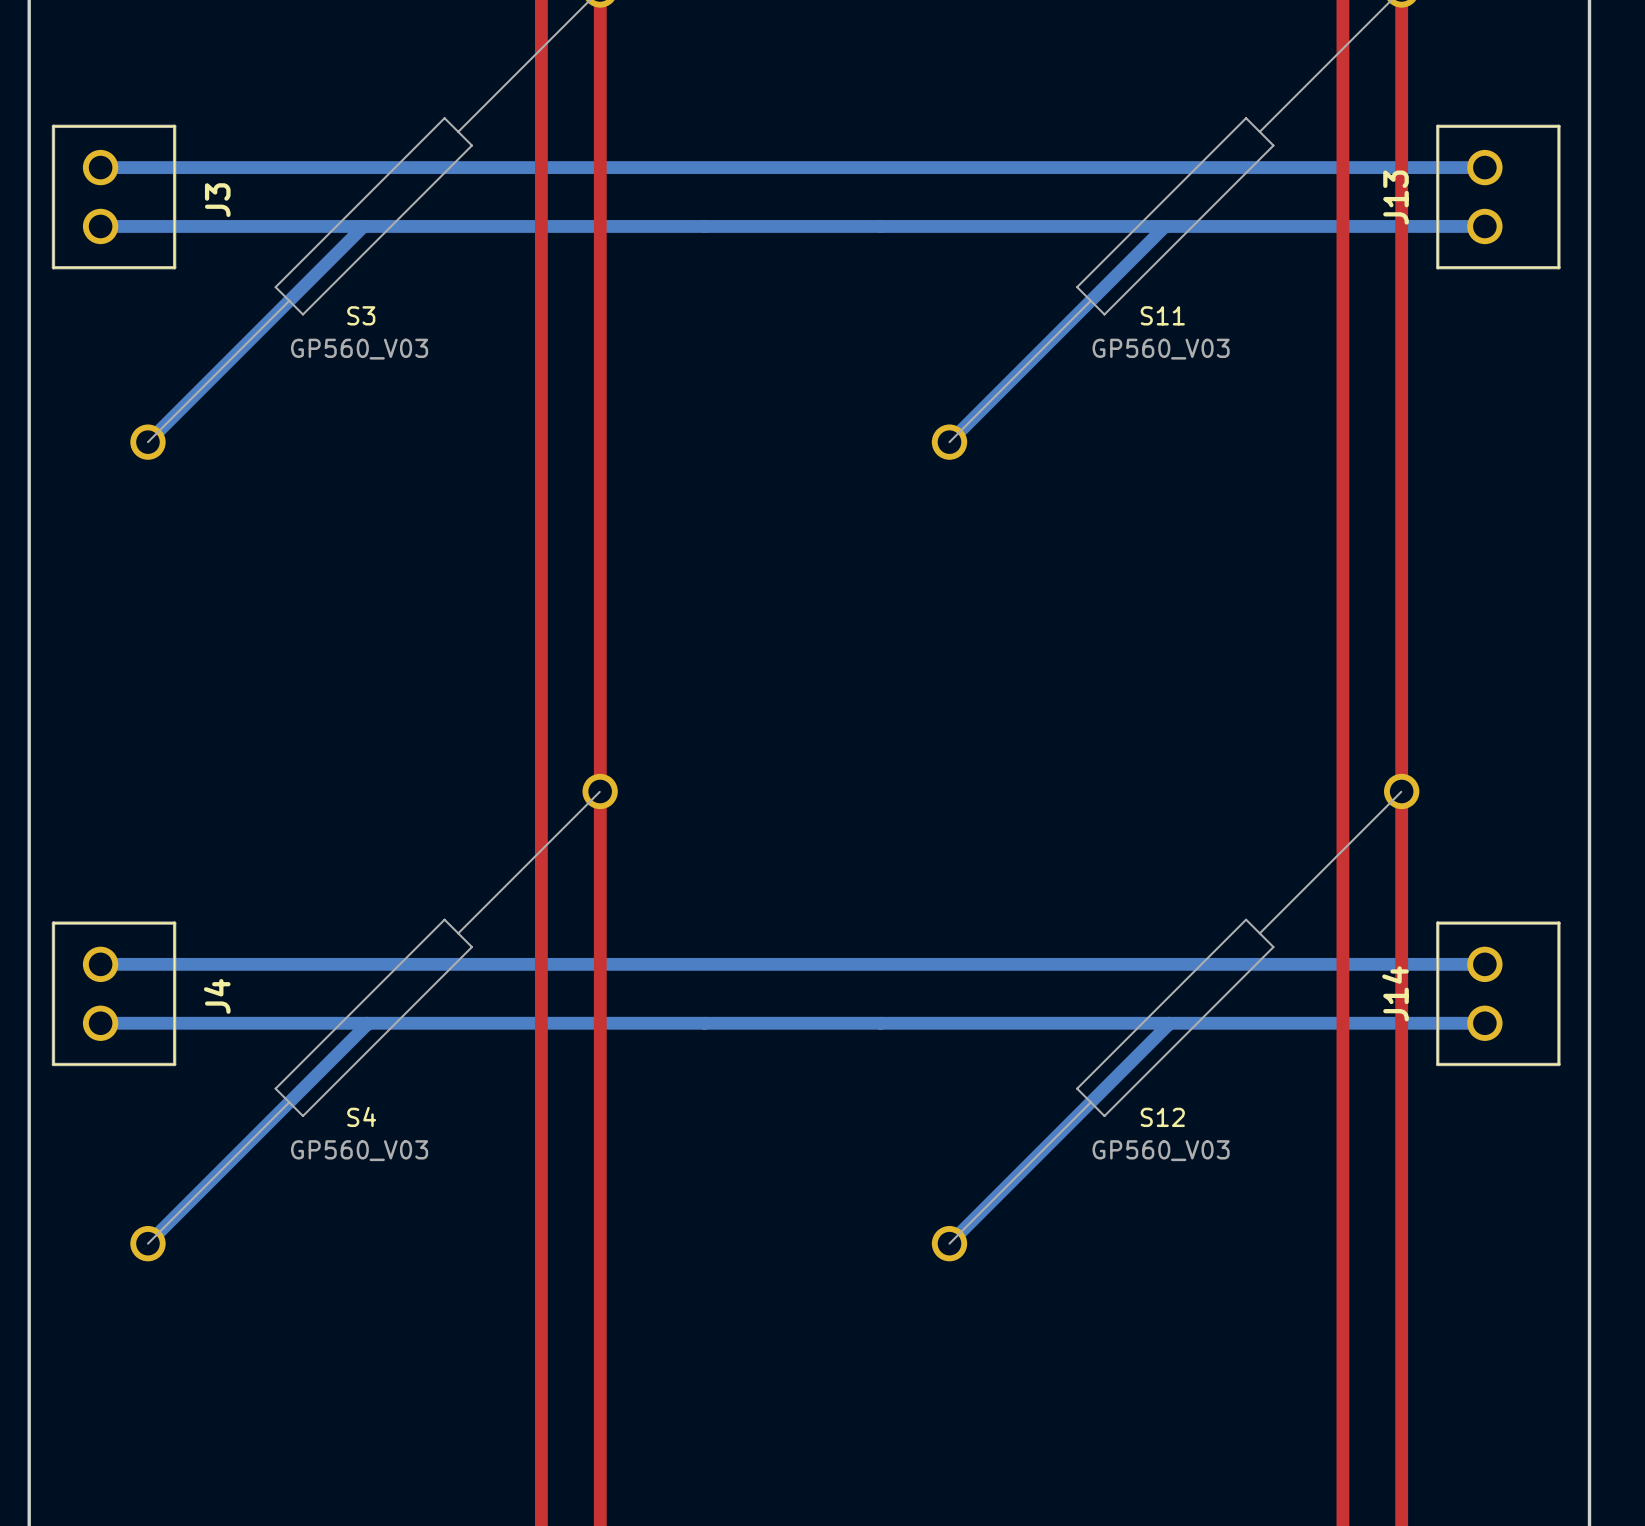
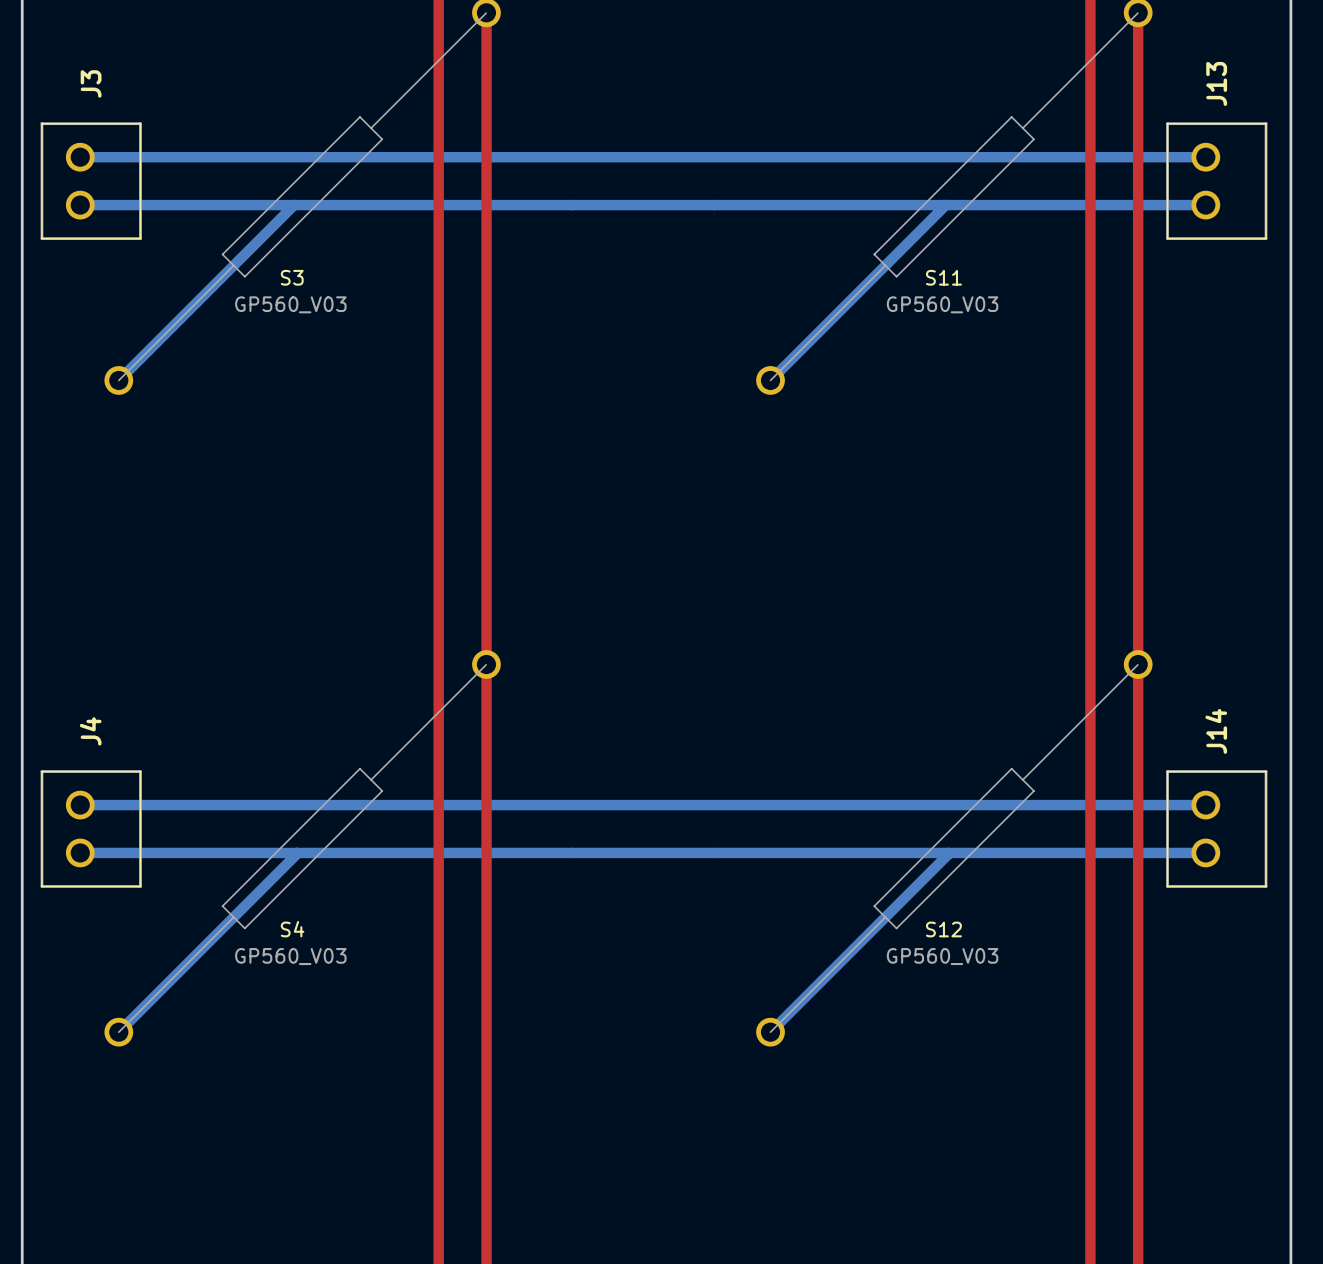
J13 name position: J13 (1396, 197) -> J13 (1216, 83)
J3 name position: J3 (217, 200) -> J3 (91, 83)
J14 name position: J14 (1395, 993) -> J14 (1216, 731)
J4 name position: J4 (217, 996) -> J4 (90, 731)

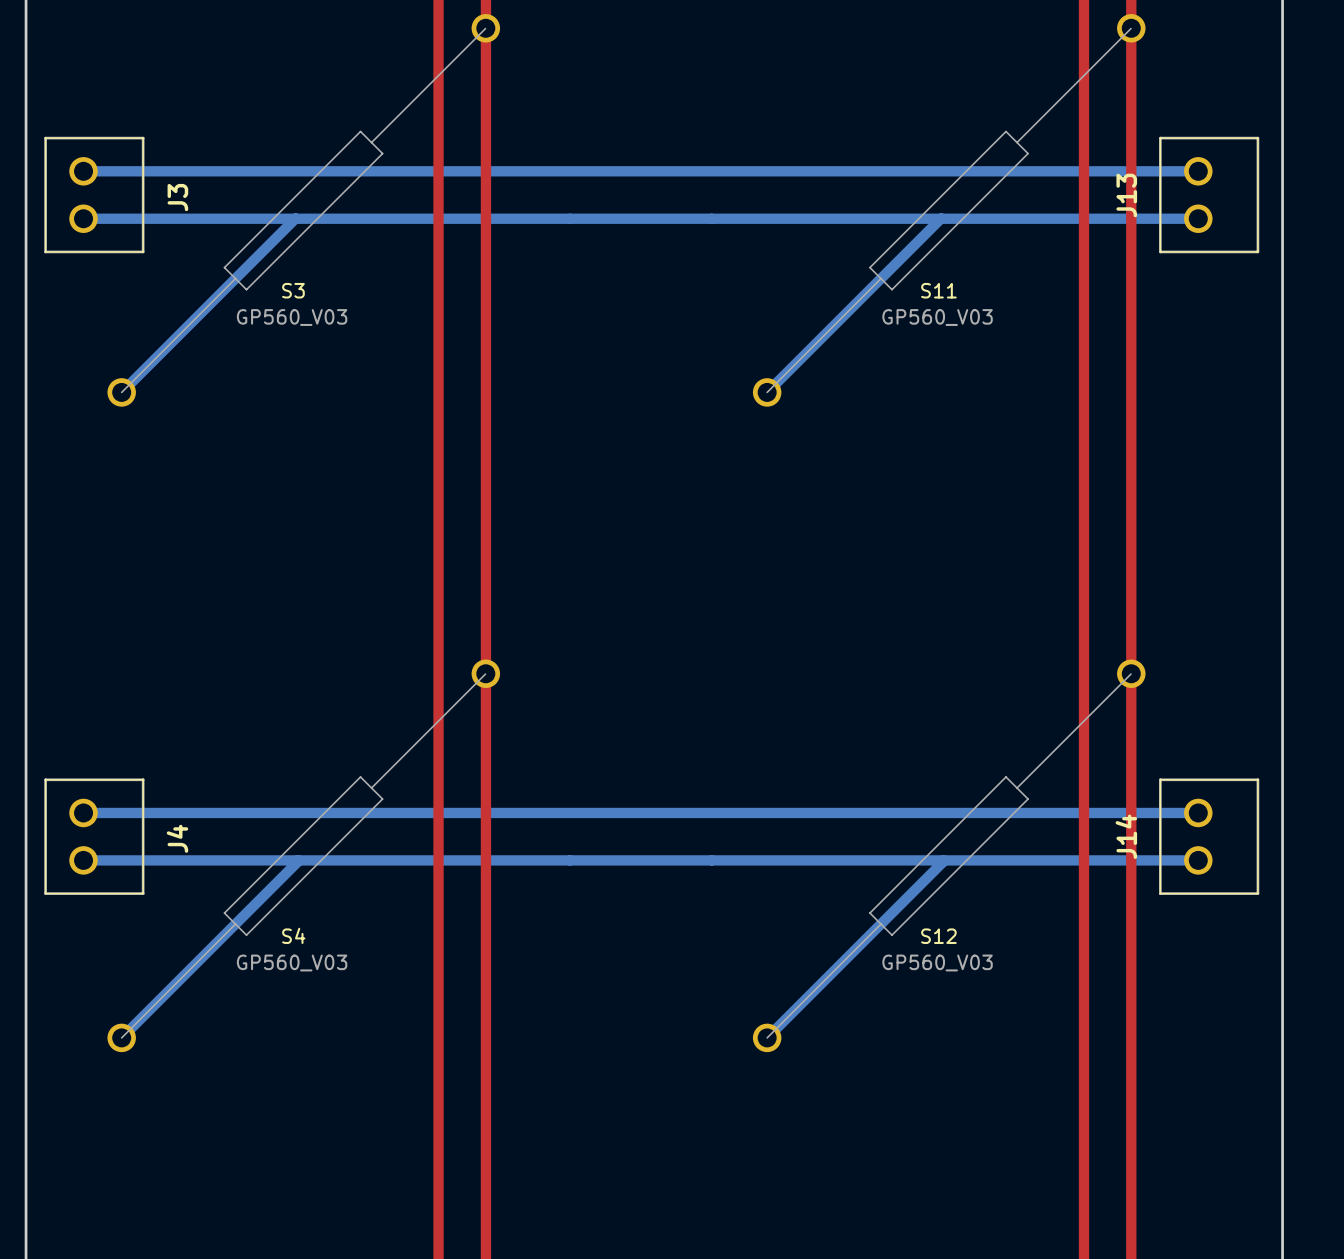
J3 name position: J3 (91, 83) -> J3 (177, 197)
J13 name position: J13 (1216, 83) -> J13 (1126, 195)
J4 name position: J4 (90, 731) -> J4 (177, 838)
J14 name position: J14 (1216, 731) -> J14 (1126, 836)

